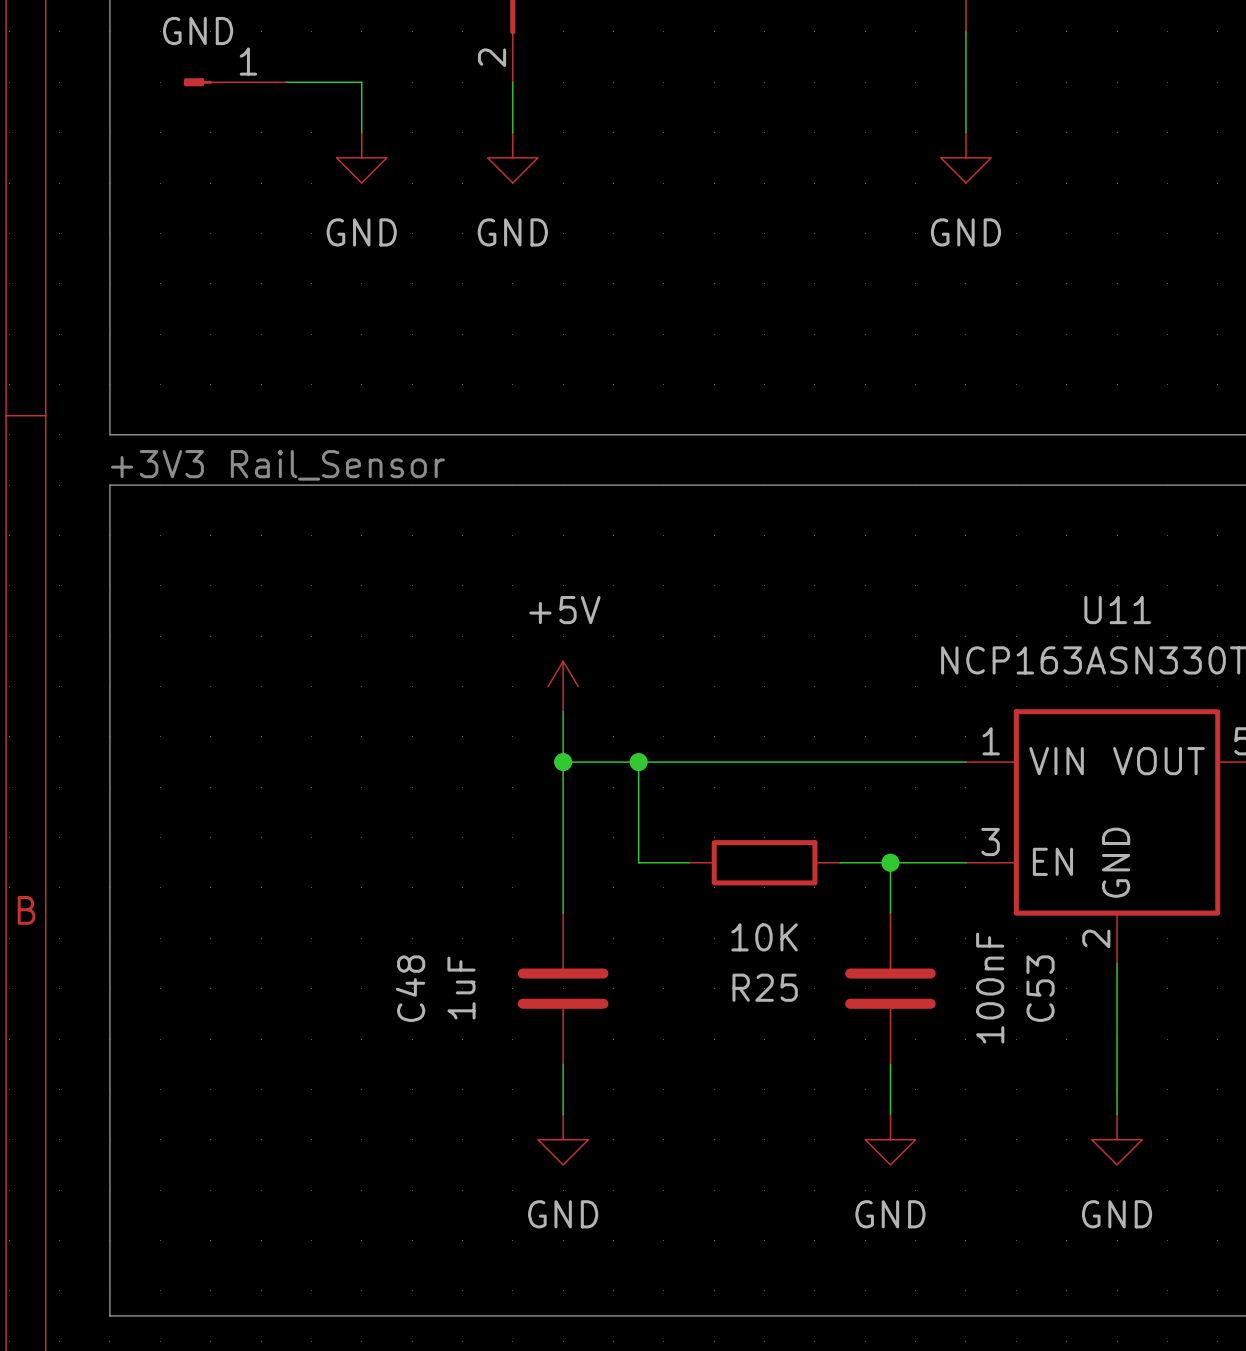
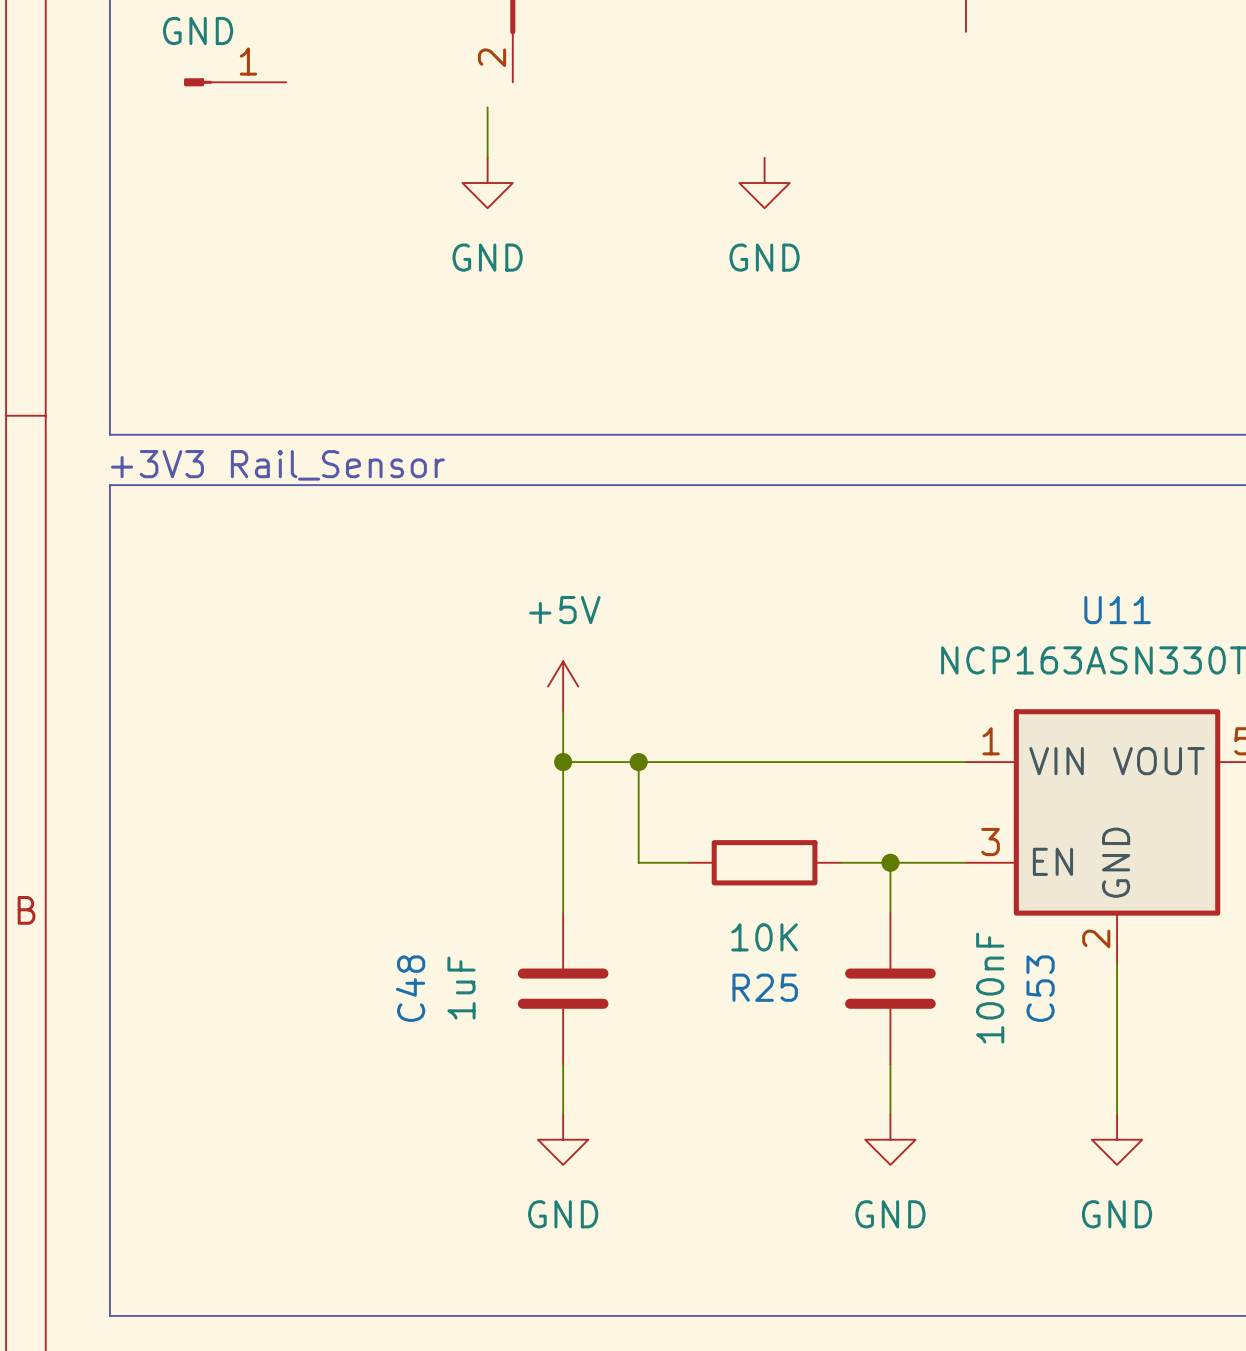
wire: (965, 31) (965, 132) -> none
wire: (286, 82) (361, 82) (361, 132) -> none
wire: (512, 82) (512, 132) -> (487, 107) (487, 157)
power symbol: GND (361, 157) -> none
power symbol position: GND (512, 157) -> GND (487, 183)
power symbol: GND (965, 157) -> none
power symbol: none -> GND (764, 183)

